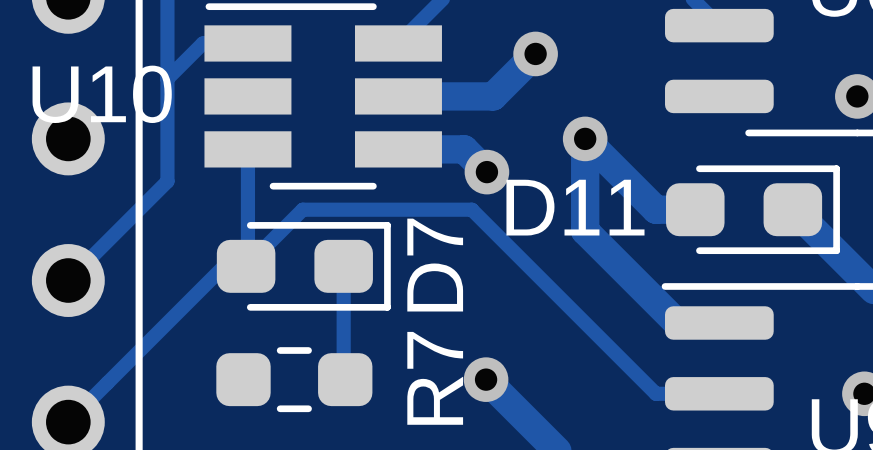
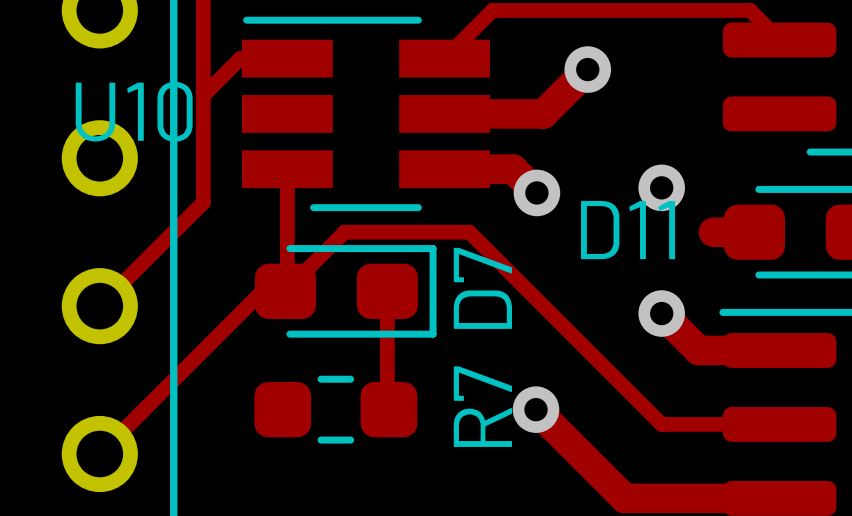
via position: (585, 138) -> (661, 187)
track: (422, 209) (471, 209) (655, 393) -> (469, 232) (661, 424) (713, 424)
track: (655, 209) (585, 138) (585, 230) (677, 322) -> (661, 313) (698, 350) (735, 350)
via: none -> (661, 313)

